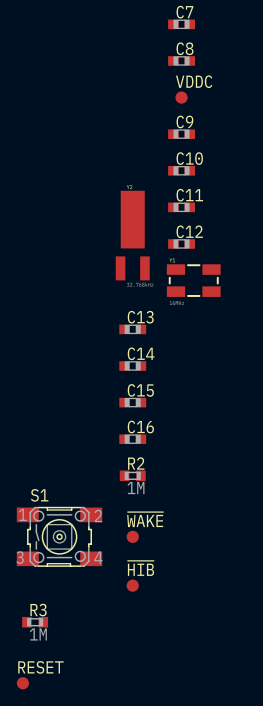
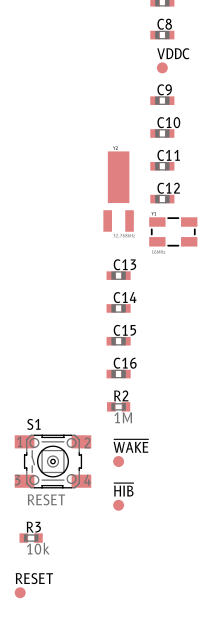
S1 value: none -> RESET (46, 499)
R3 value: 1M (38, 634) -> 10k (38, 548)

